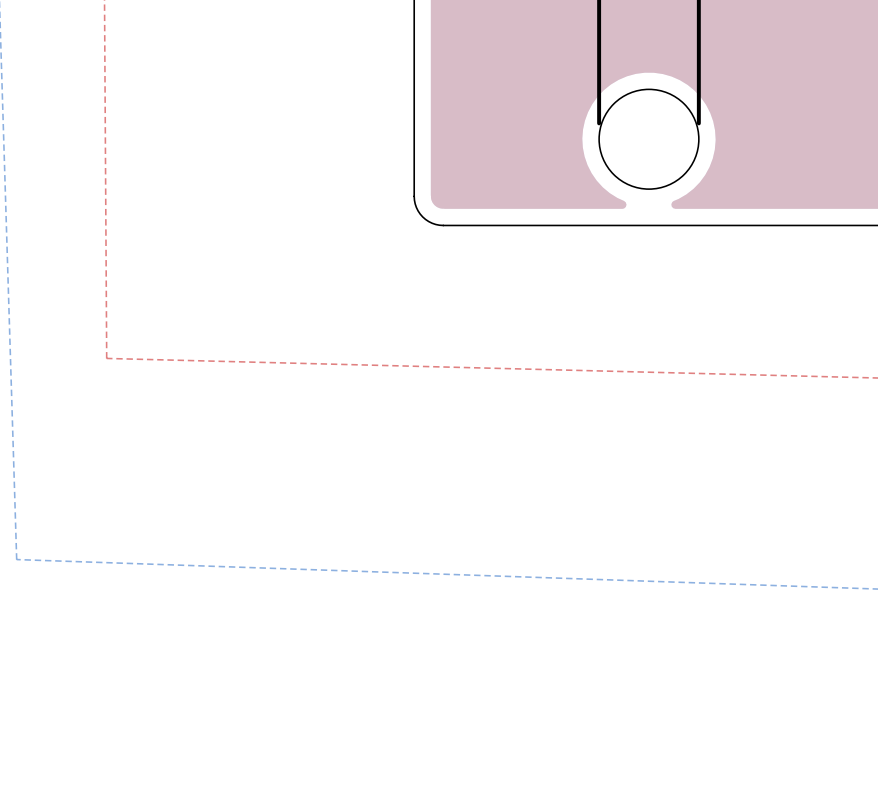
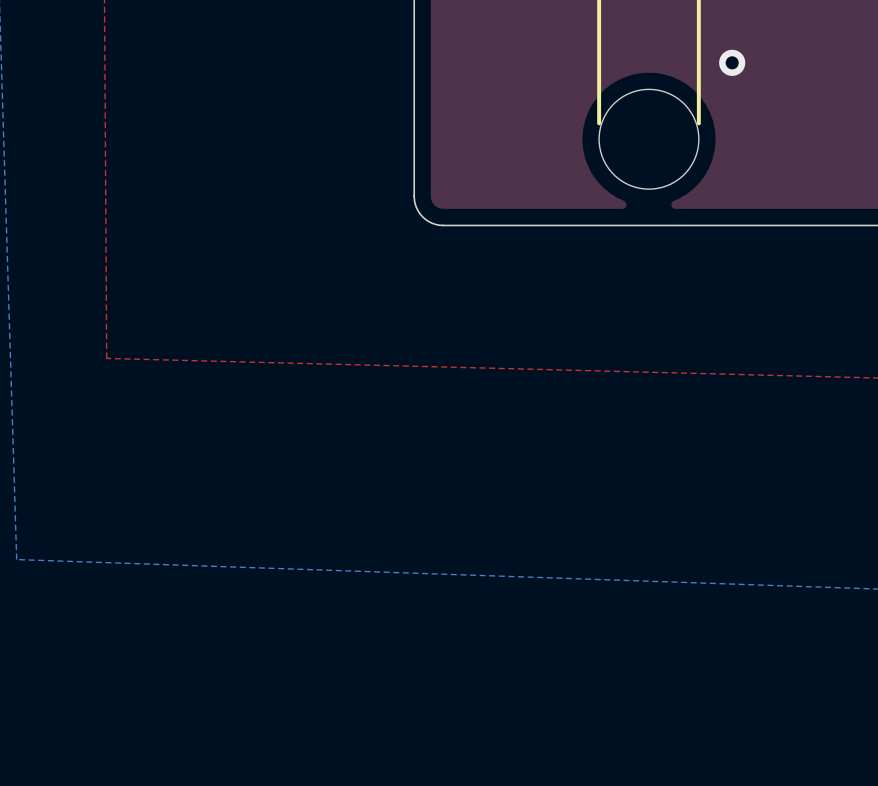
via: none -> (732, 62)

